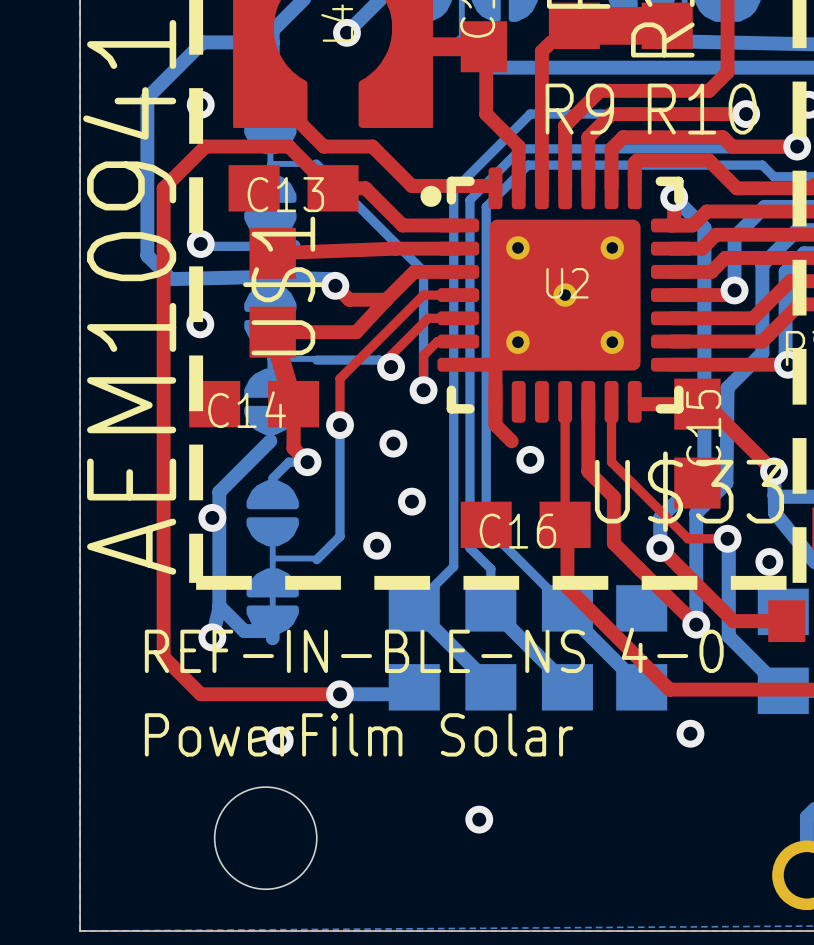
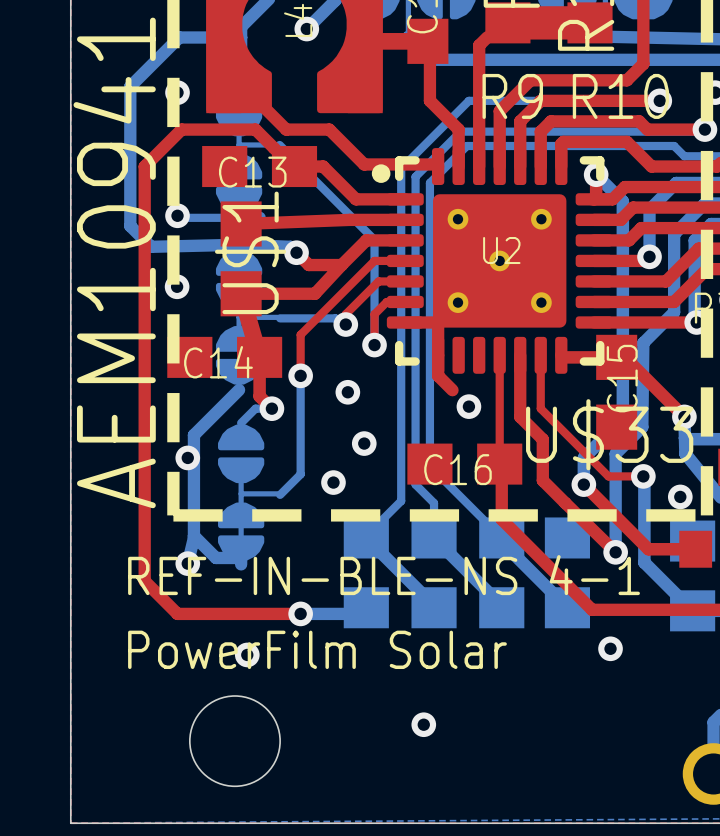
text: REF-IN-BLE-NS 4-0 (434, 650) -> REF-IN-BLE-NS 4-1 (384, 575)

